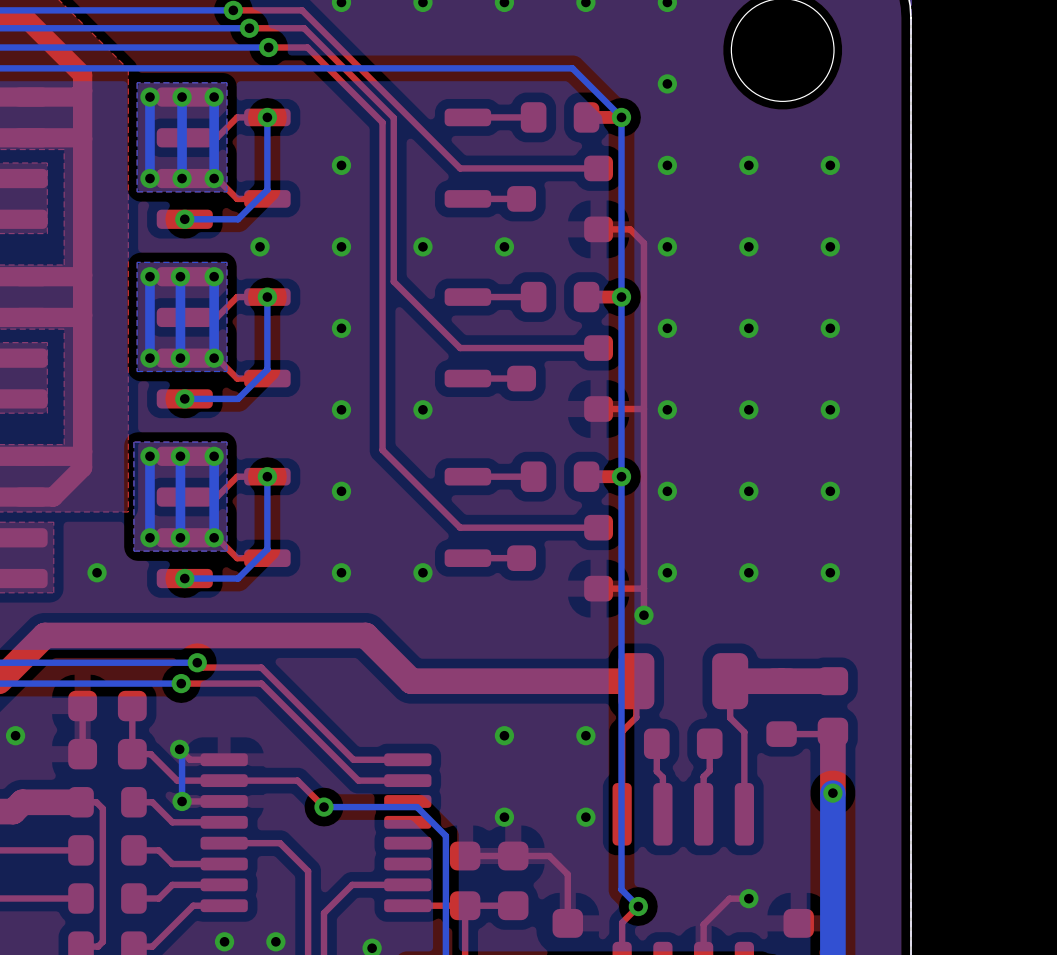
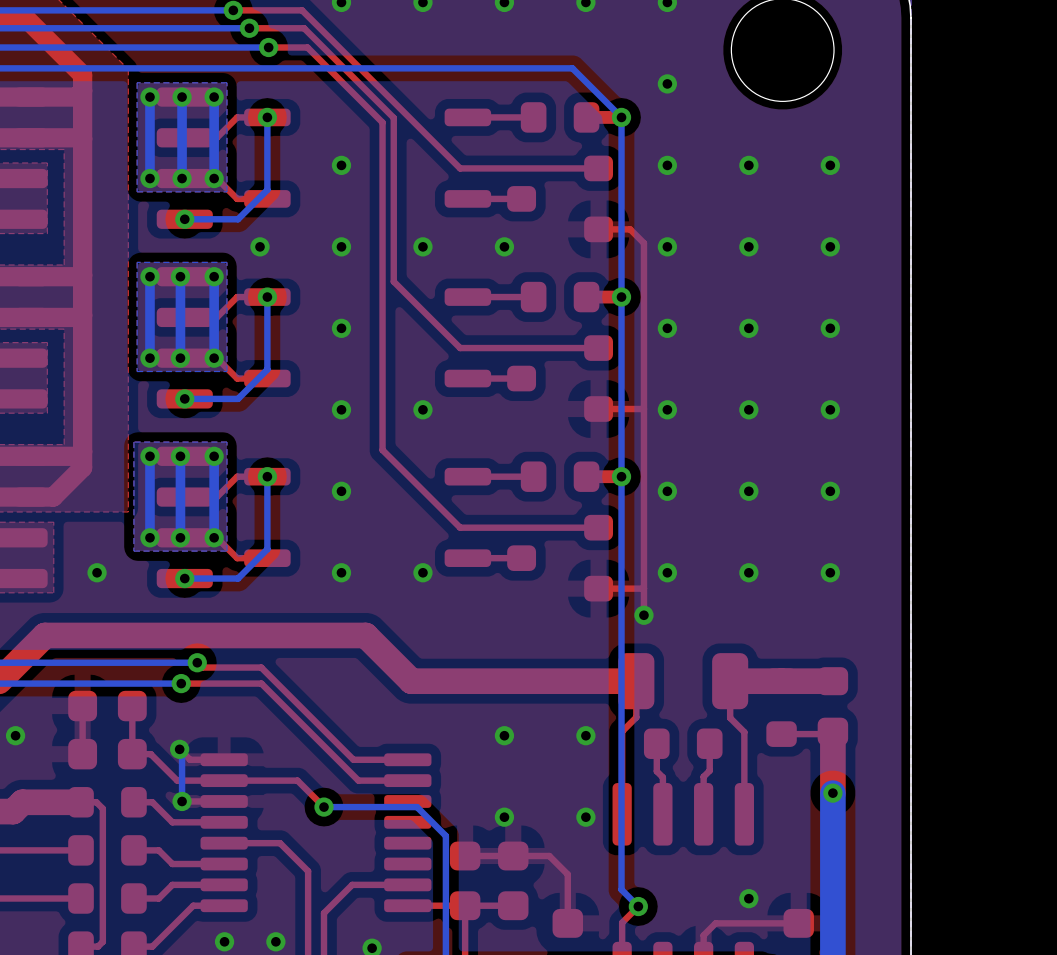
top track: (748, 898) (729, 898) (703, 924) (703, 935) -> (798, 923) (715, 923) (703, 935)

